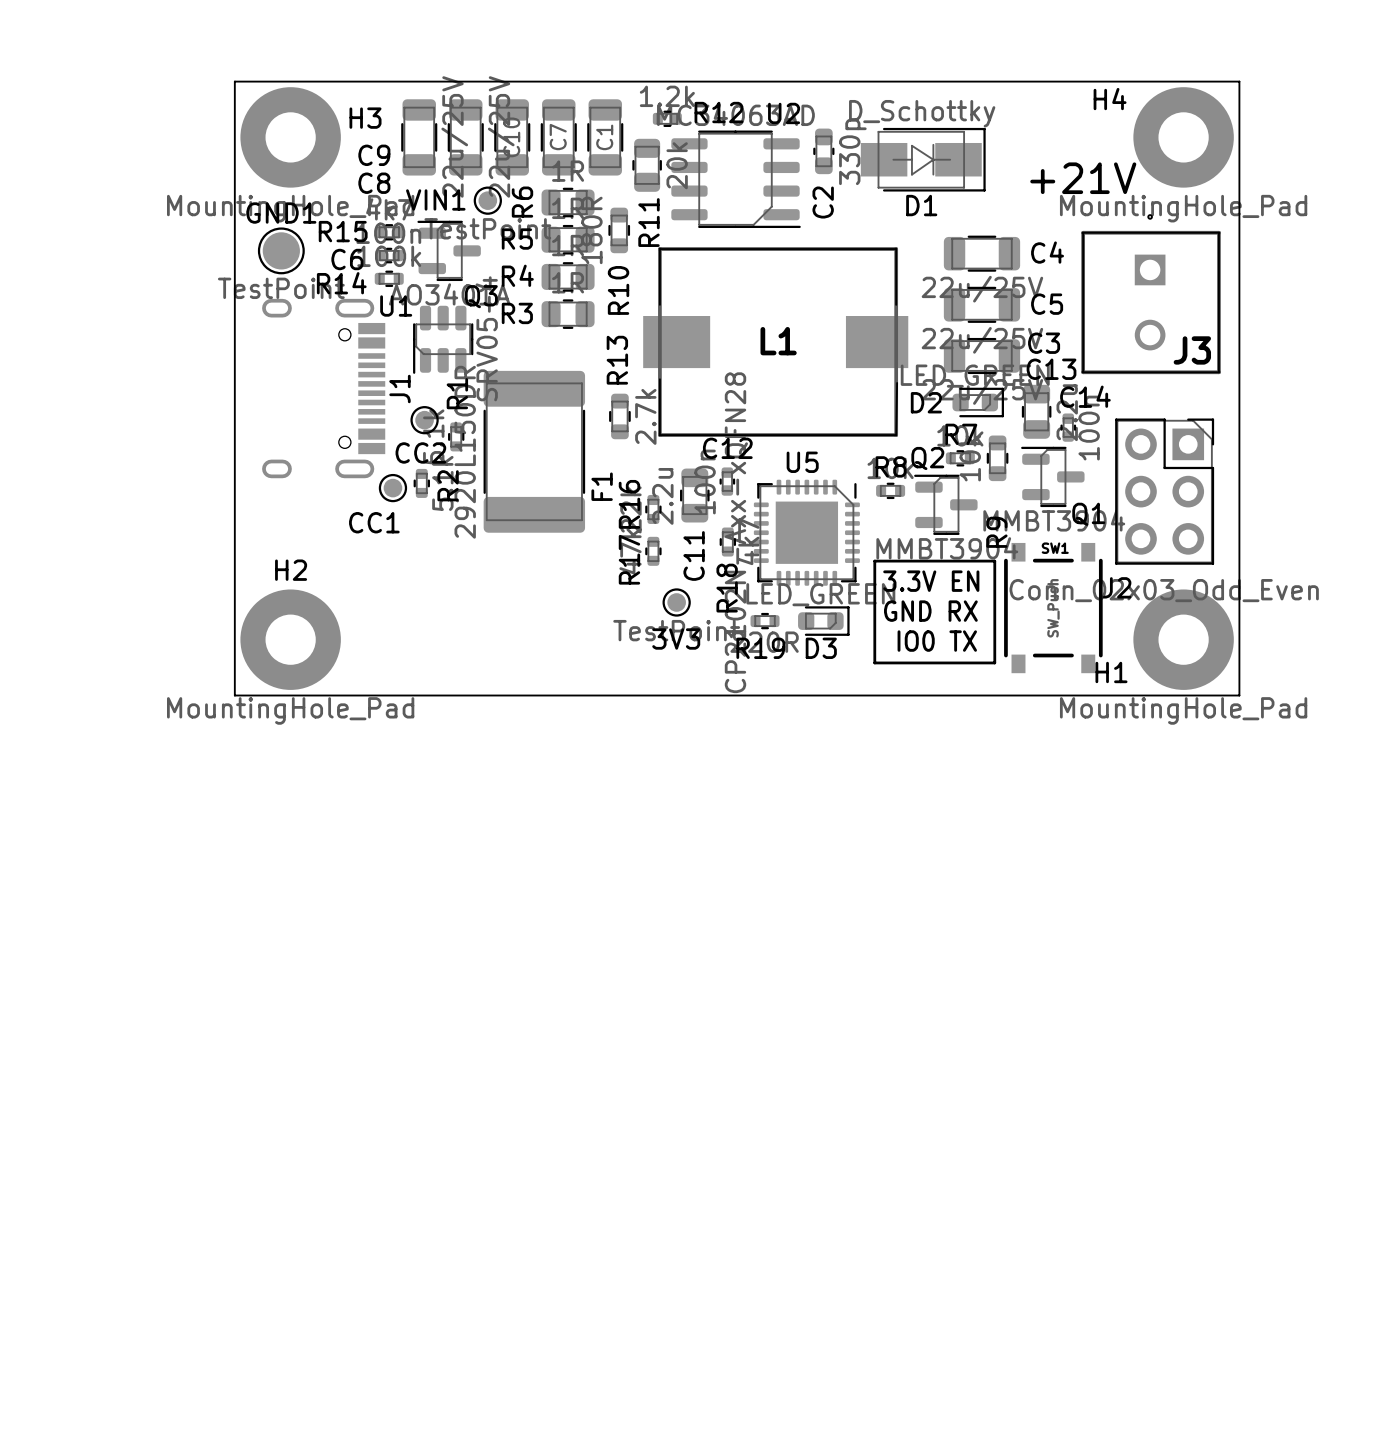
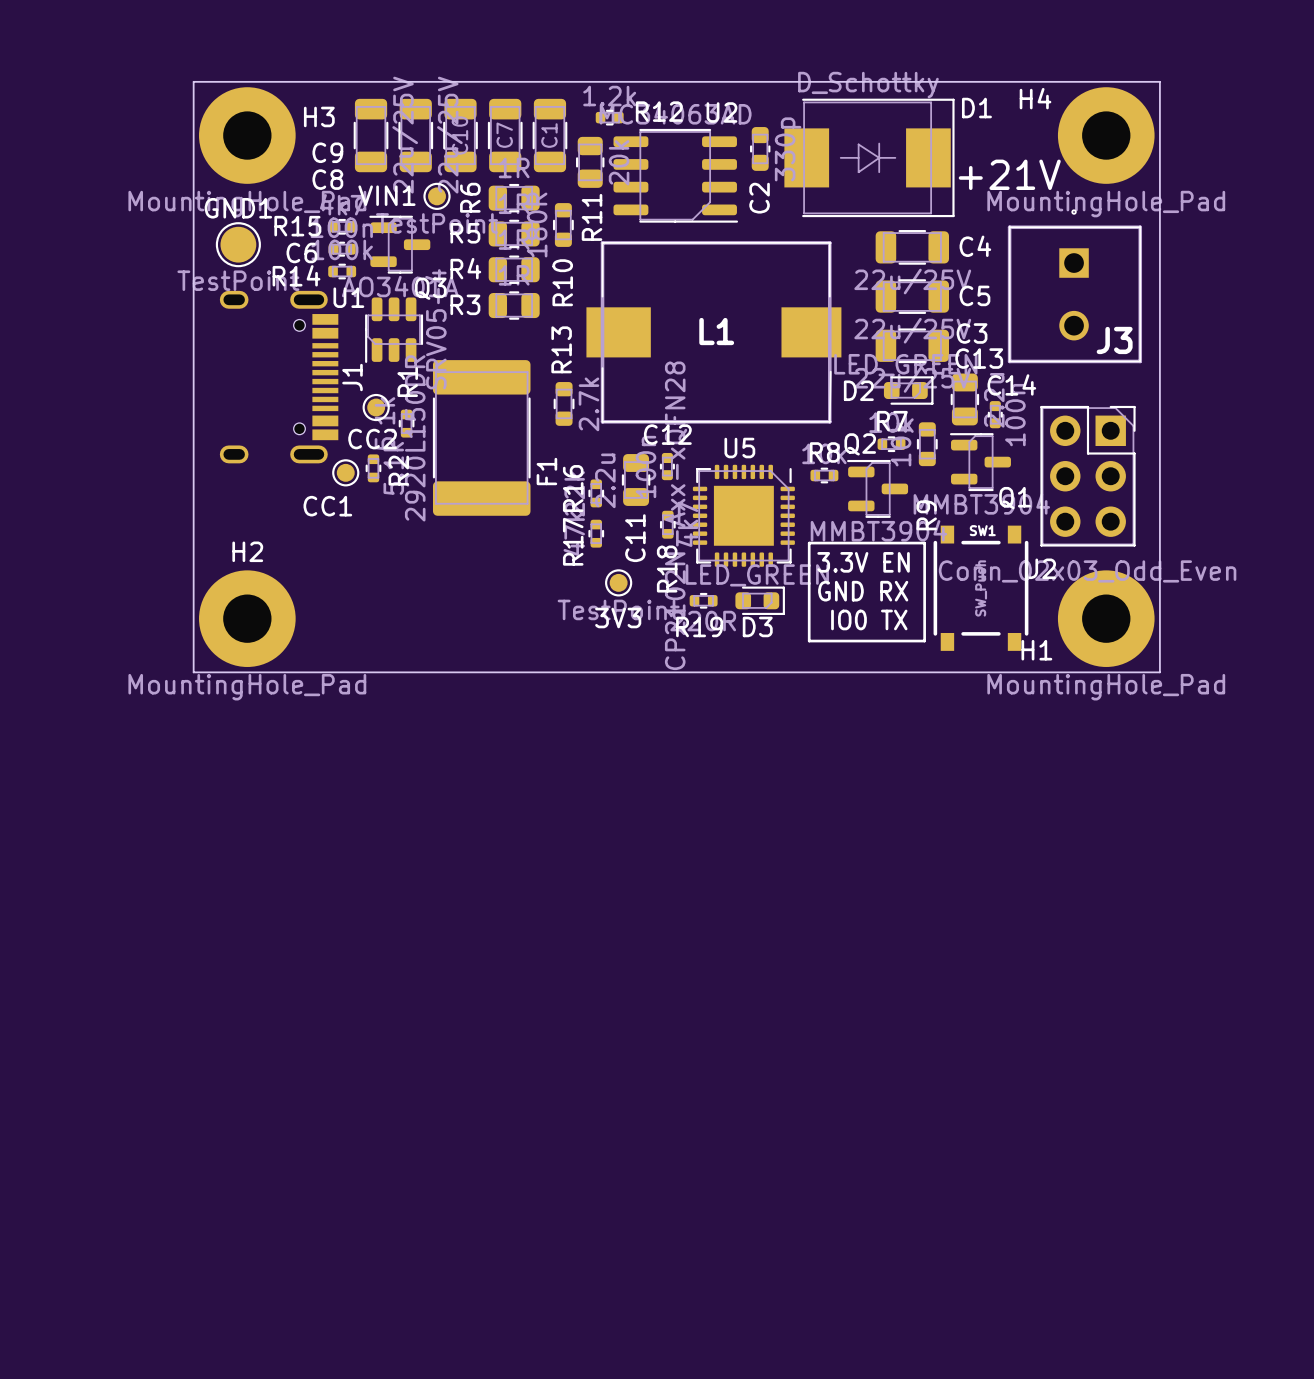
D1 footprint: [860, 127, 986, 192] -> [784, 98, 955, 218]
D1 name position: D1 (921, 205) -> D1 (976, 108)

